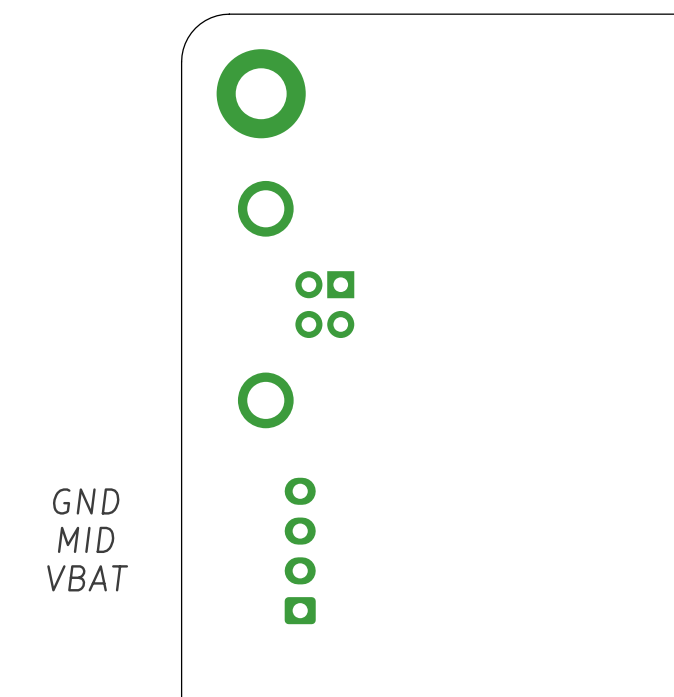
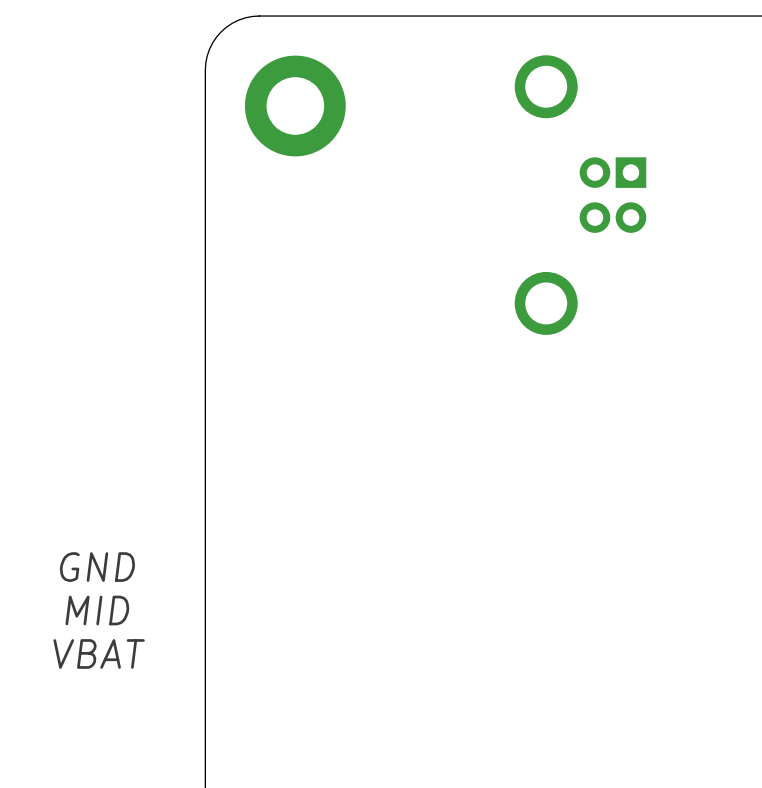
part position: (296, 304) -> (580, 195)
part: (300, 550) -> none

